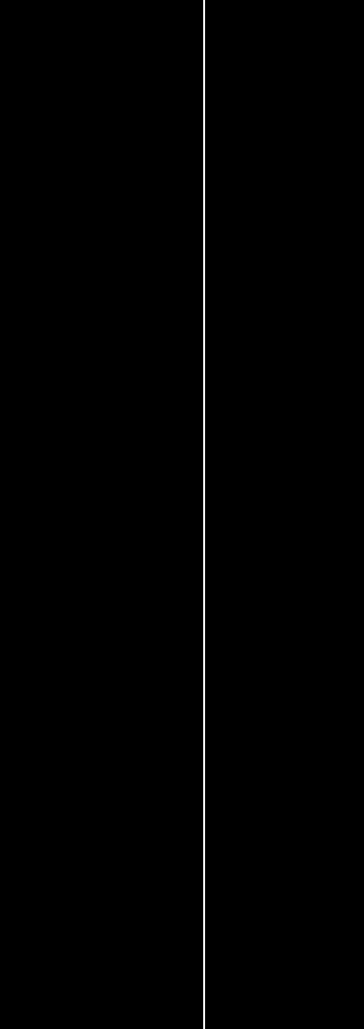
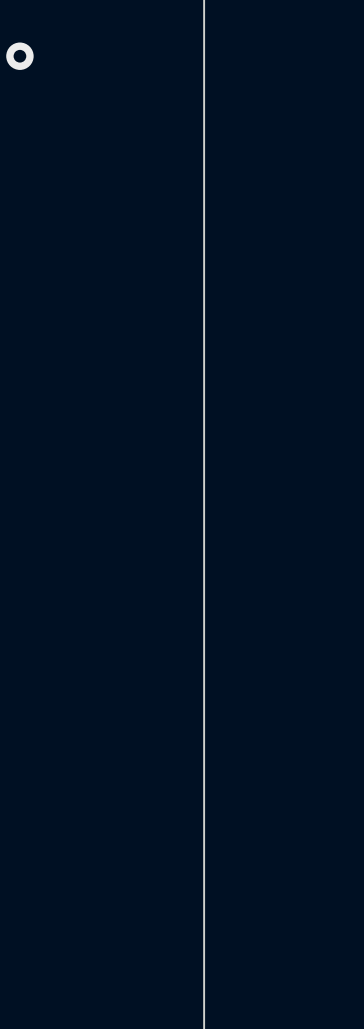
via: none -> (19, 56)

